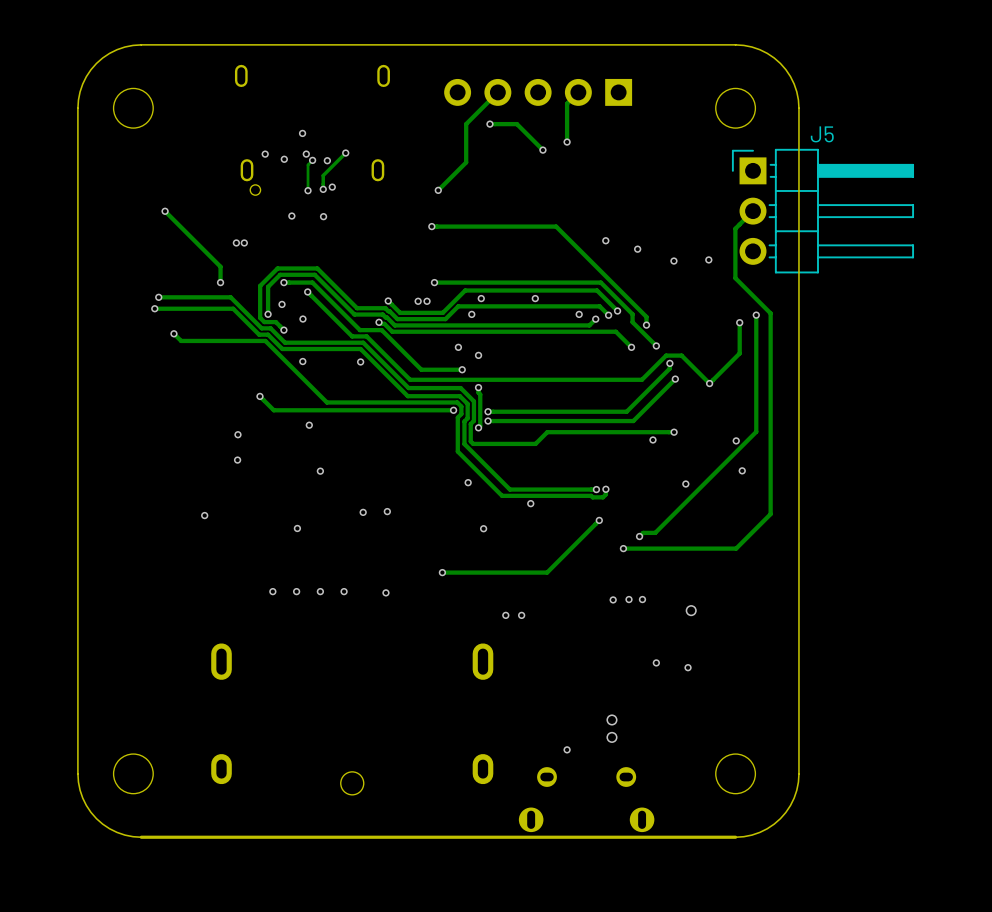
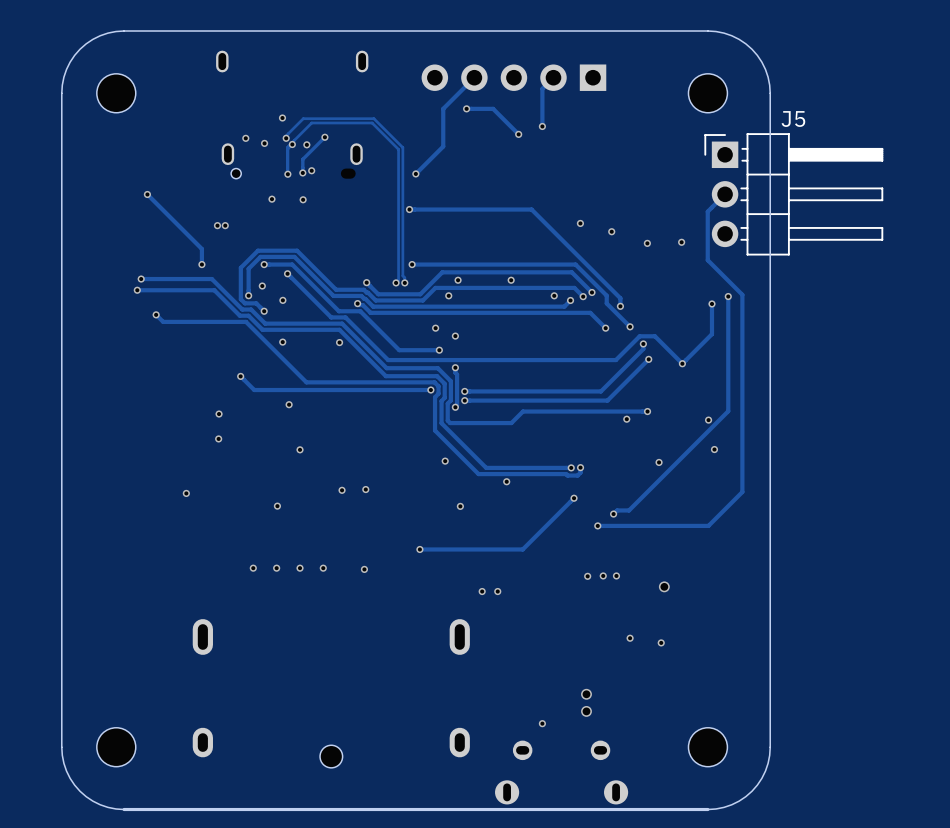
track: none -> (284, 137) (303, 118) (373, 118) (402, 147) (402, 275) (404, 282)
track: none -> (287, 173) (287, 147) (311, 122) (372, 122) (398, 149) (398, 280) (396, 282)

